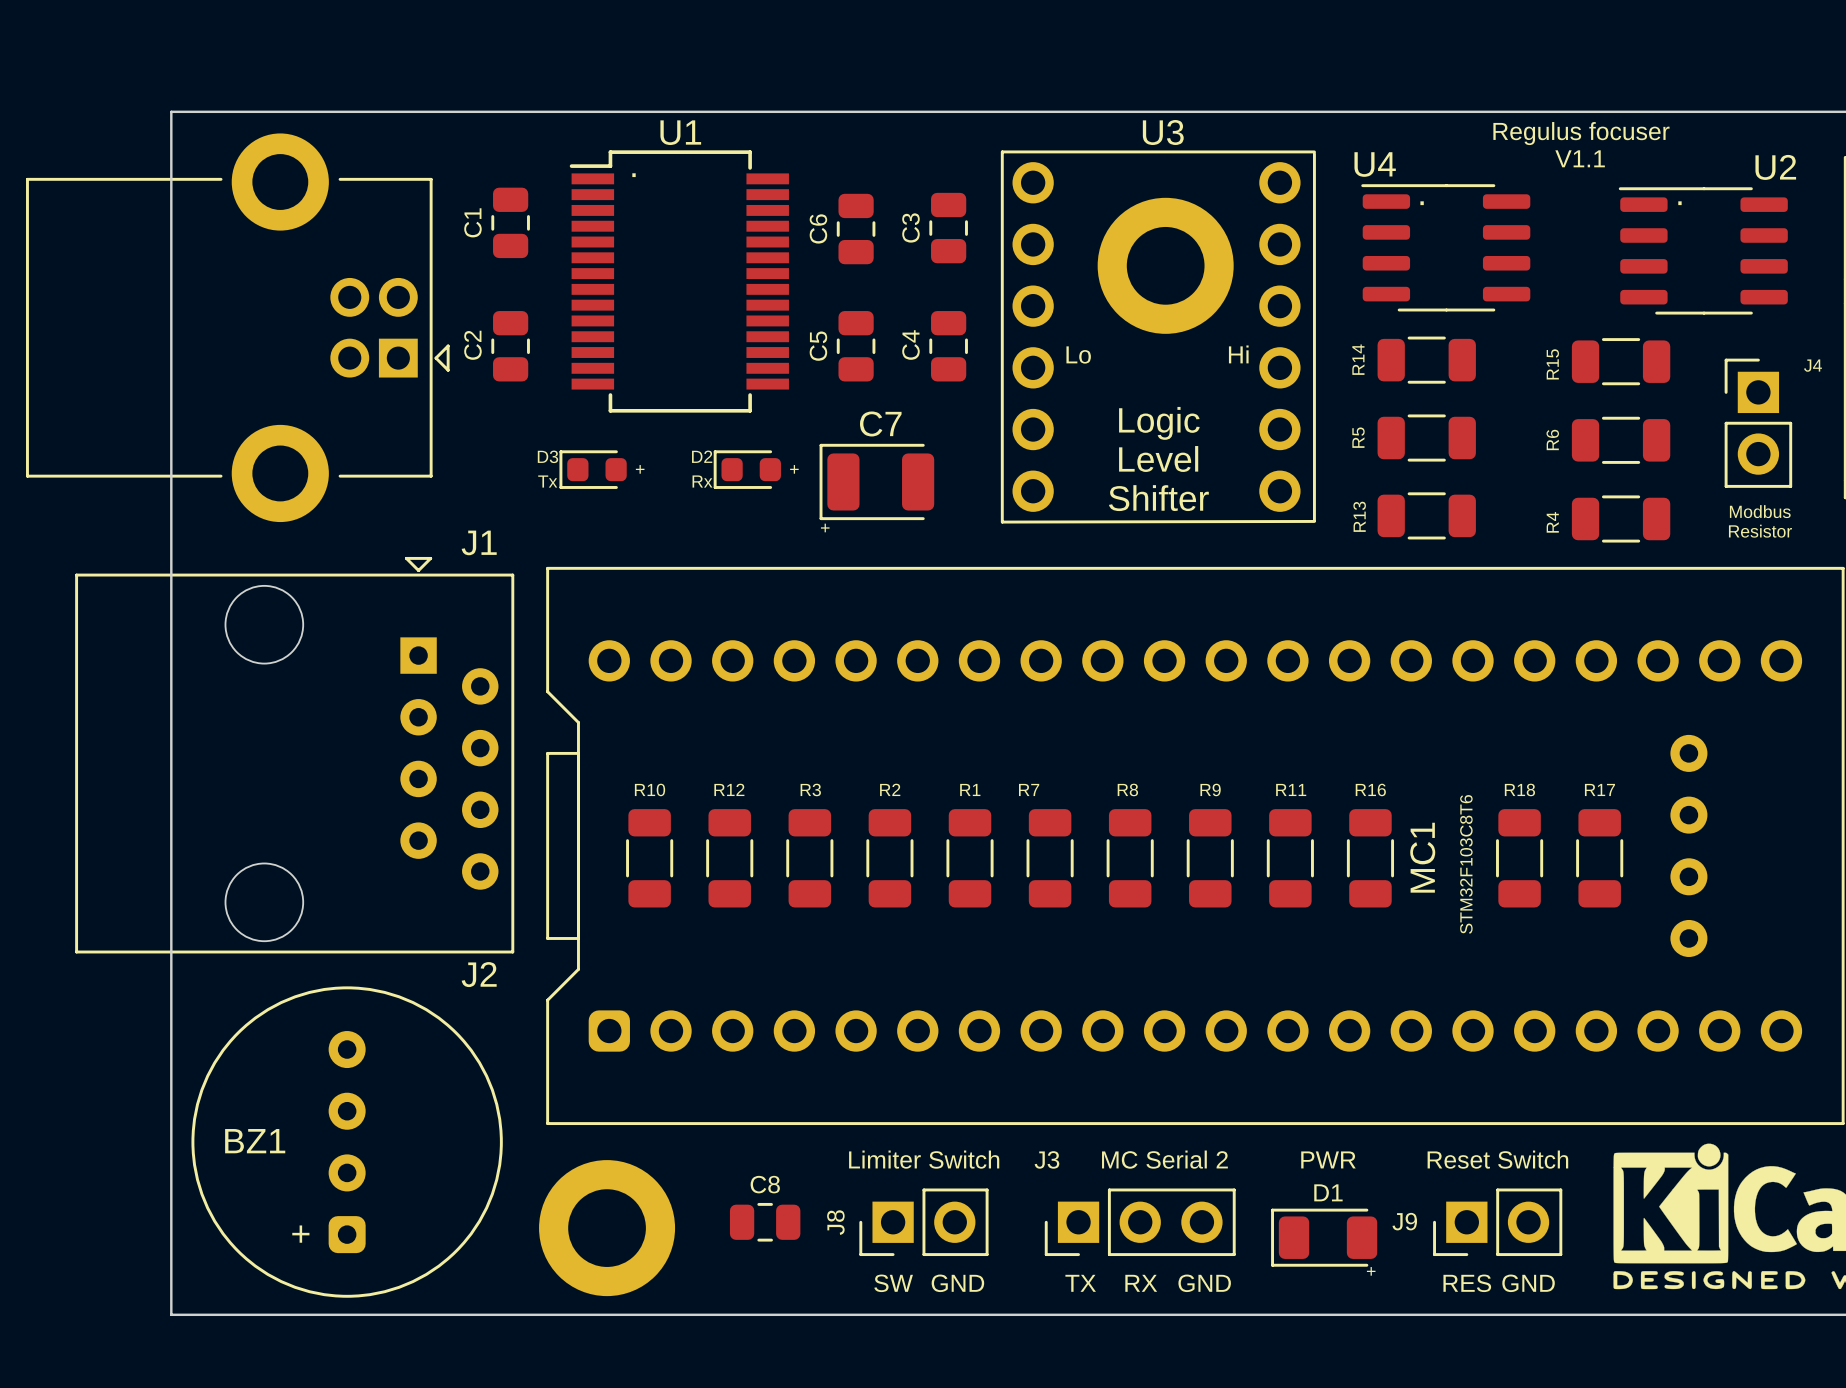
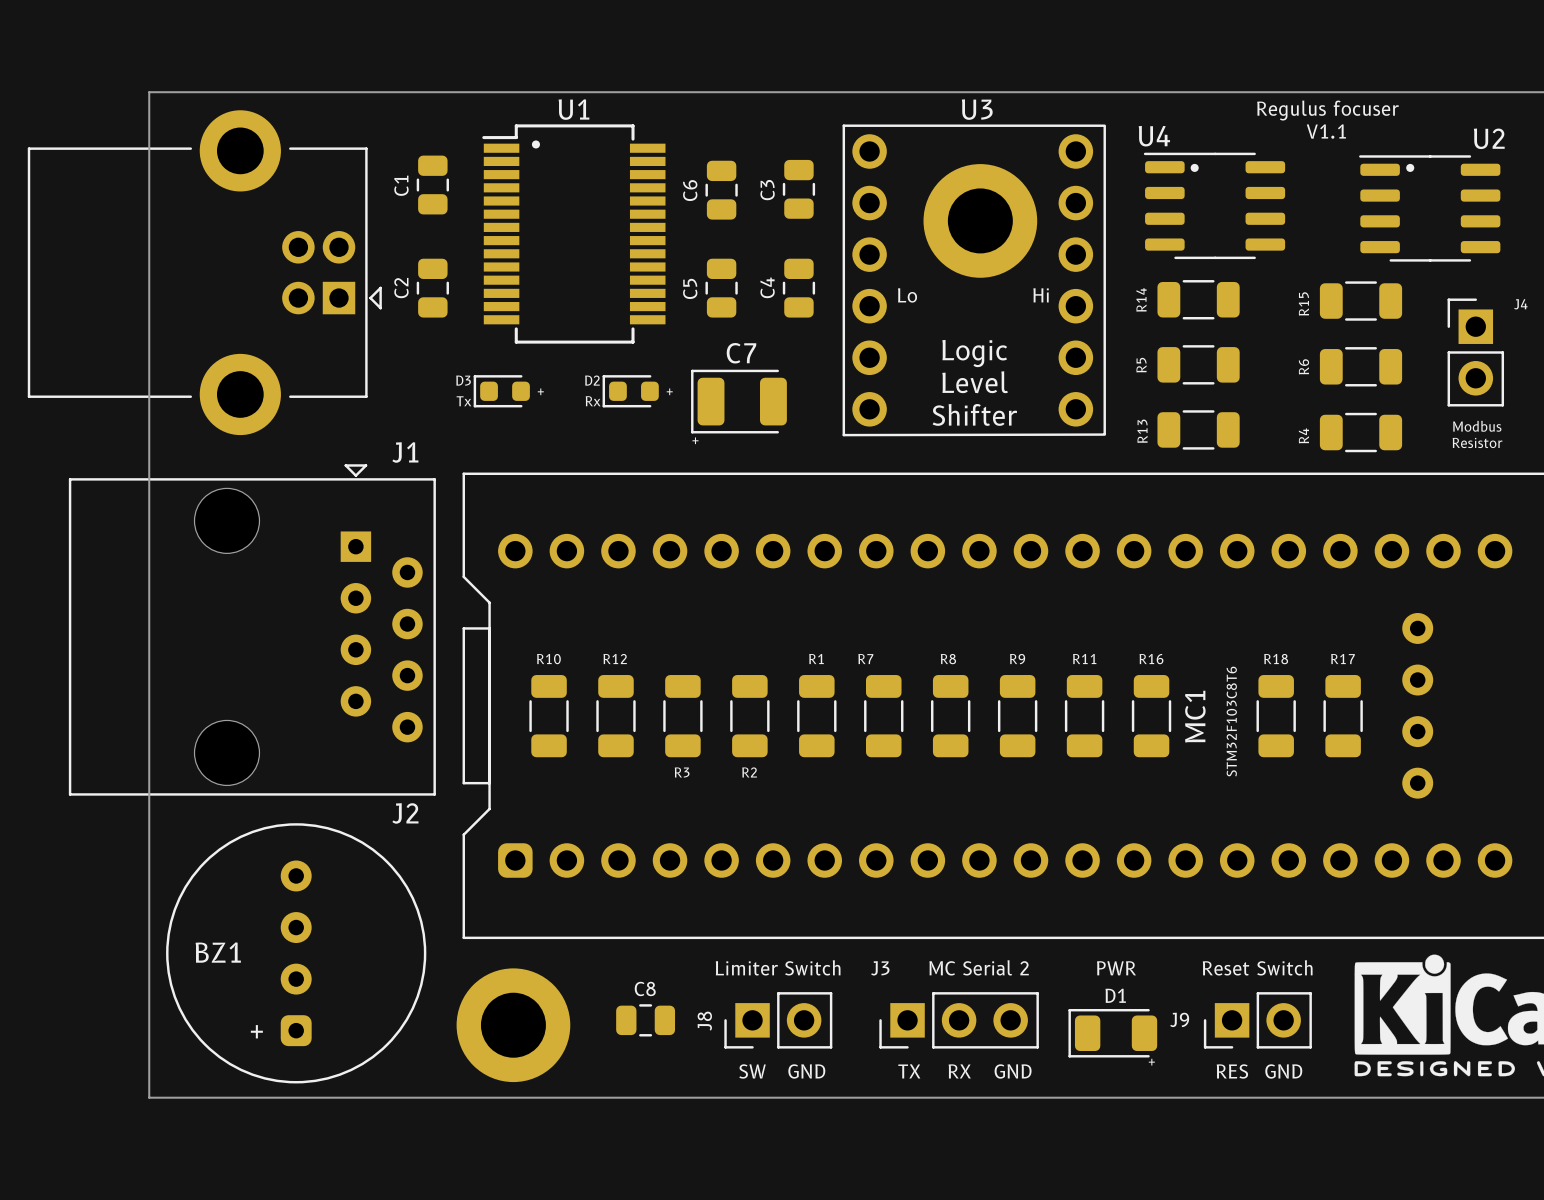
R3 name position: R3 (810, 789) -> R3 (682, 772)
R2 name position: R2 (890, 789) -> R2 (749, 772)

